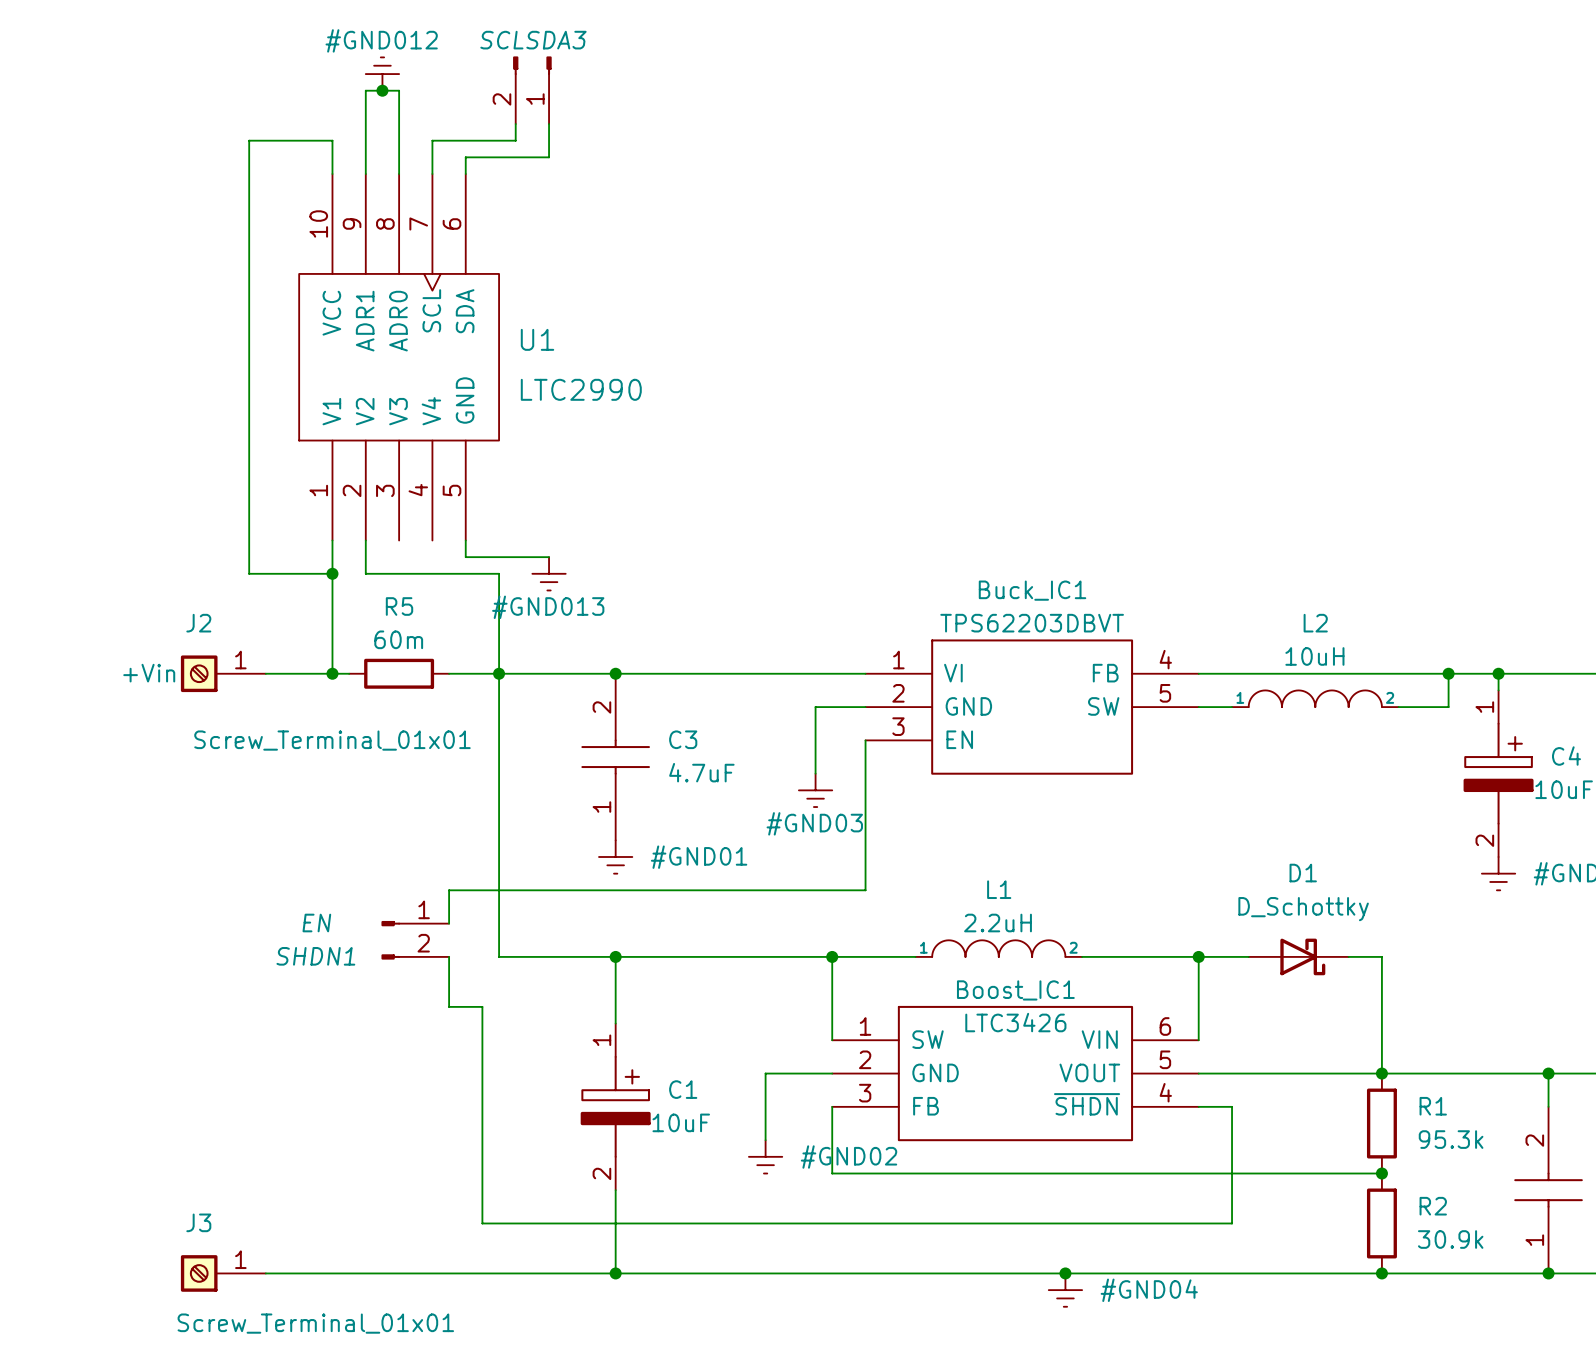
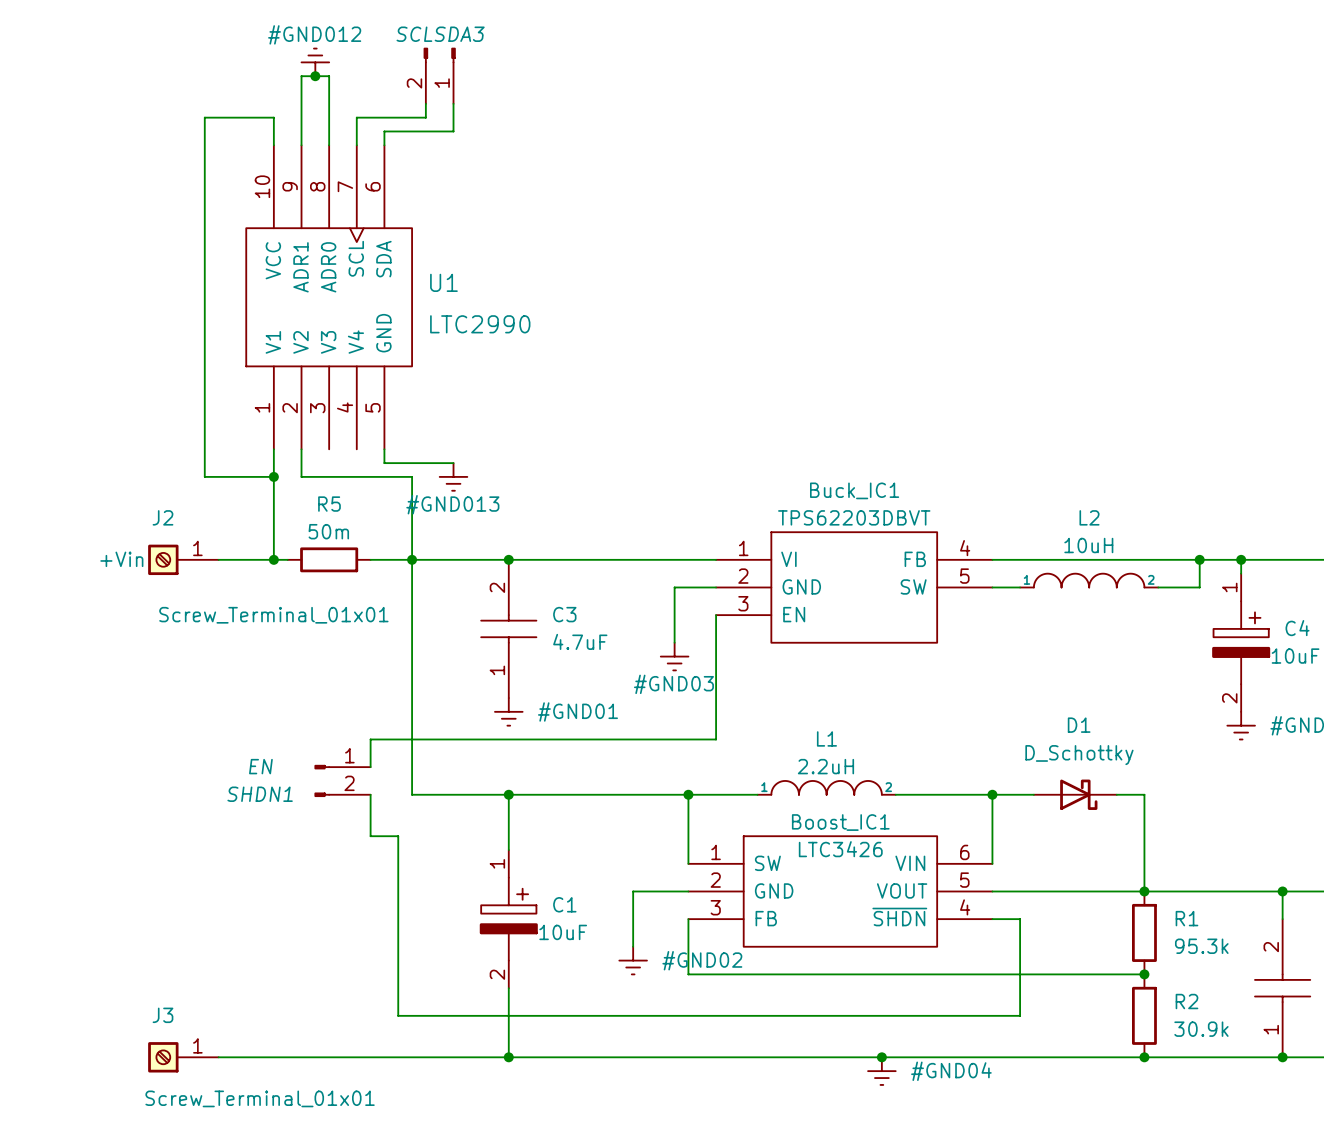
R5 value: 60m (398, 639) -> 50m (328, 531)

